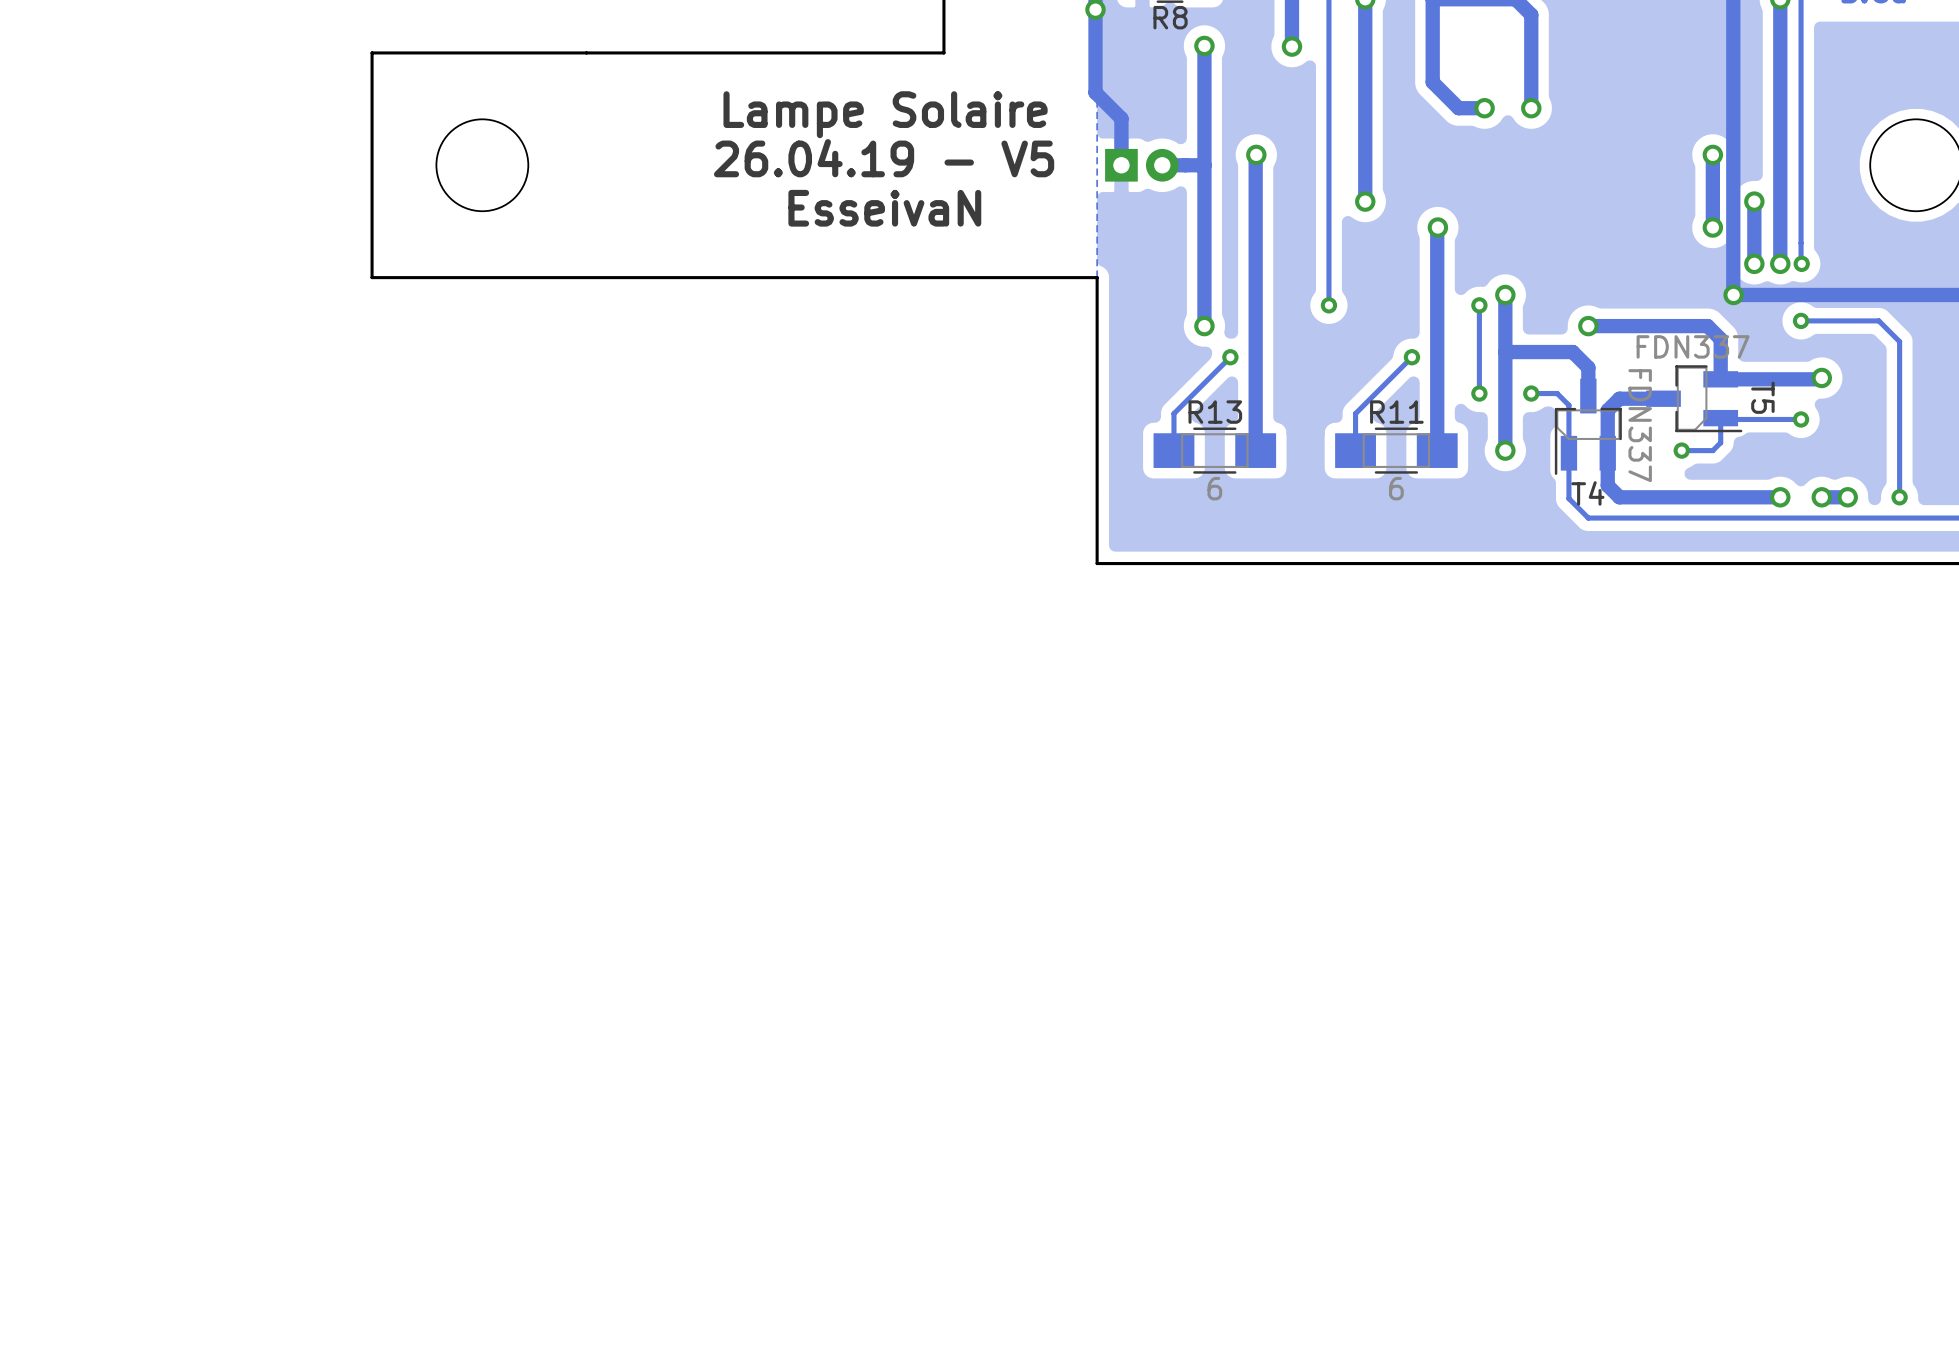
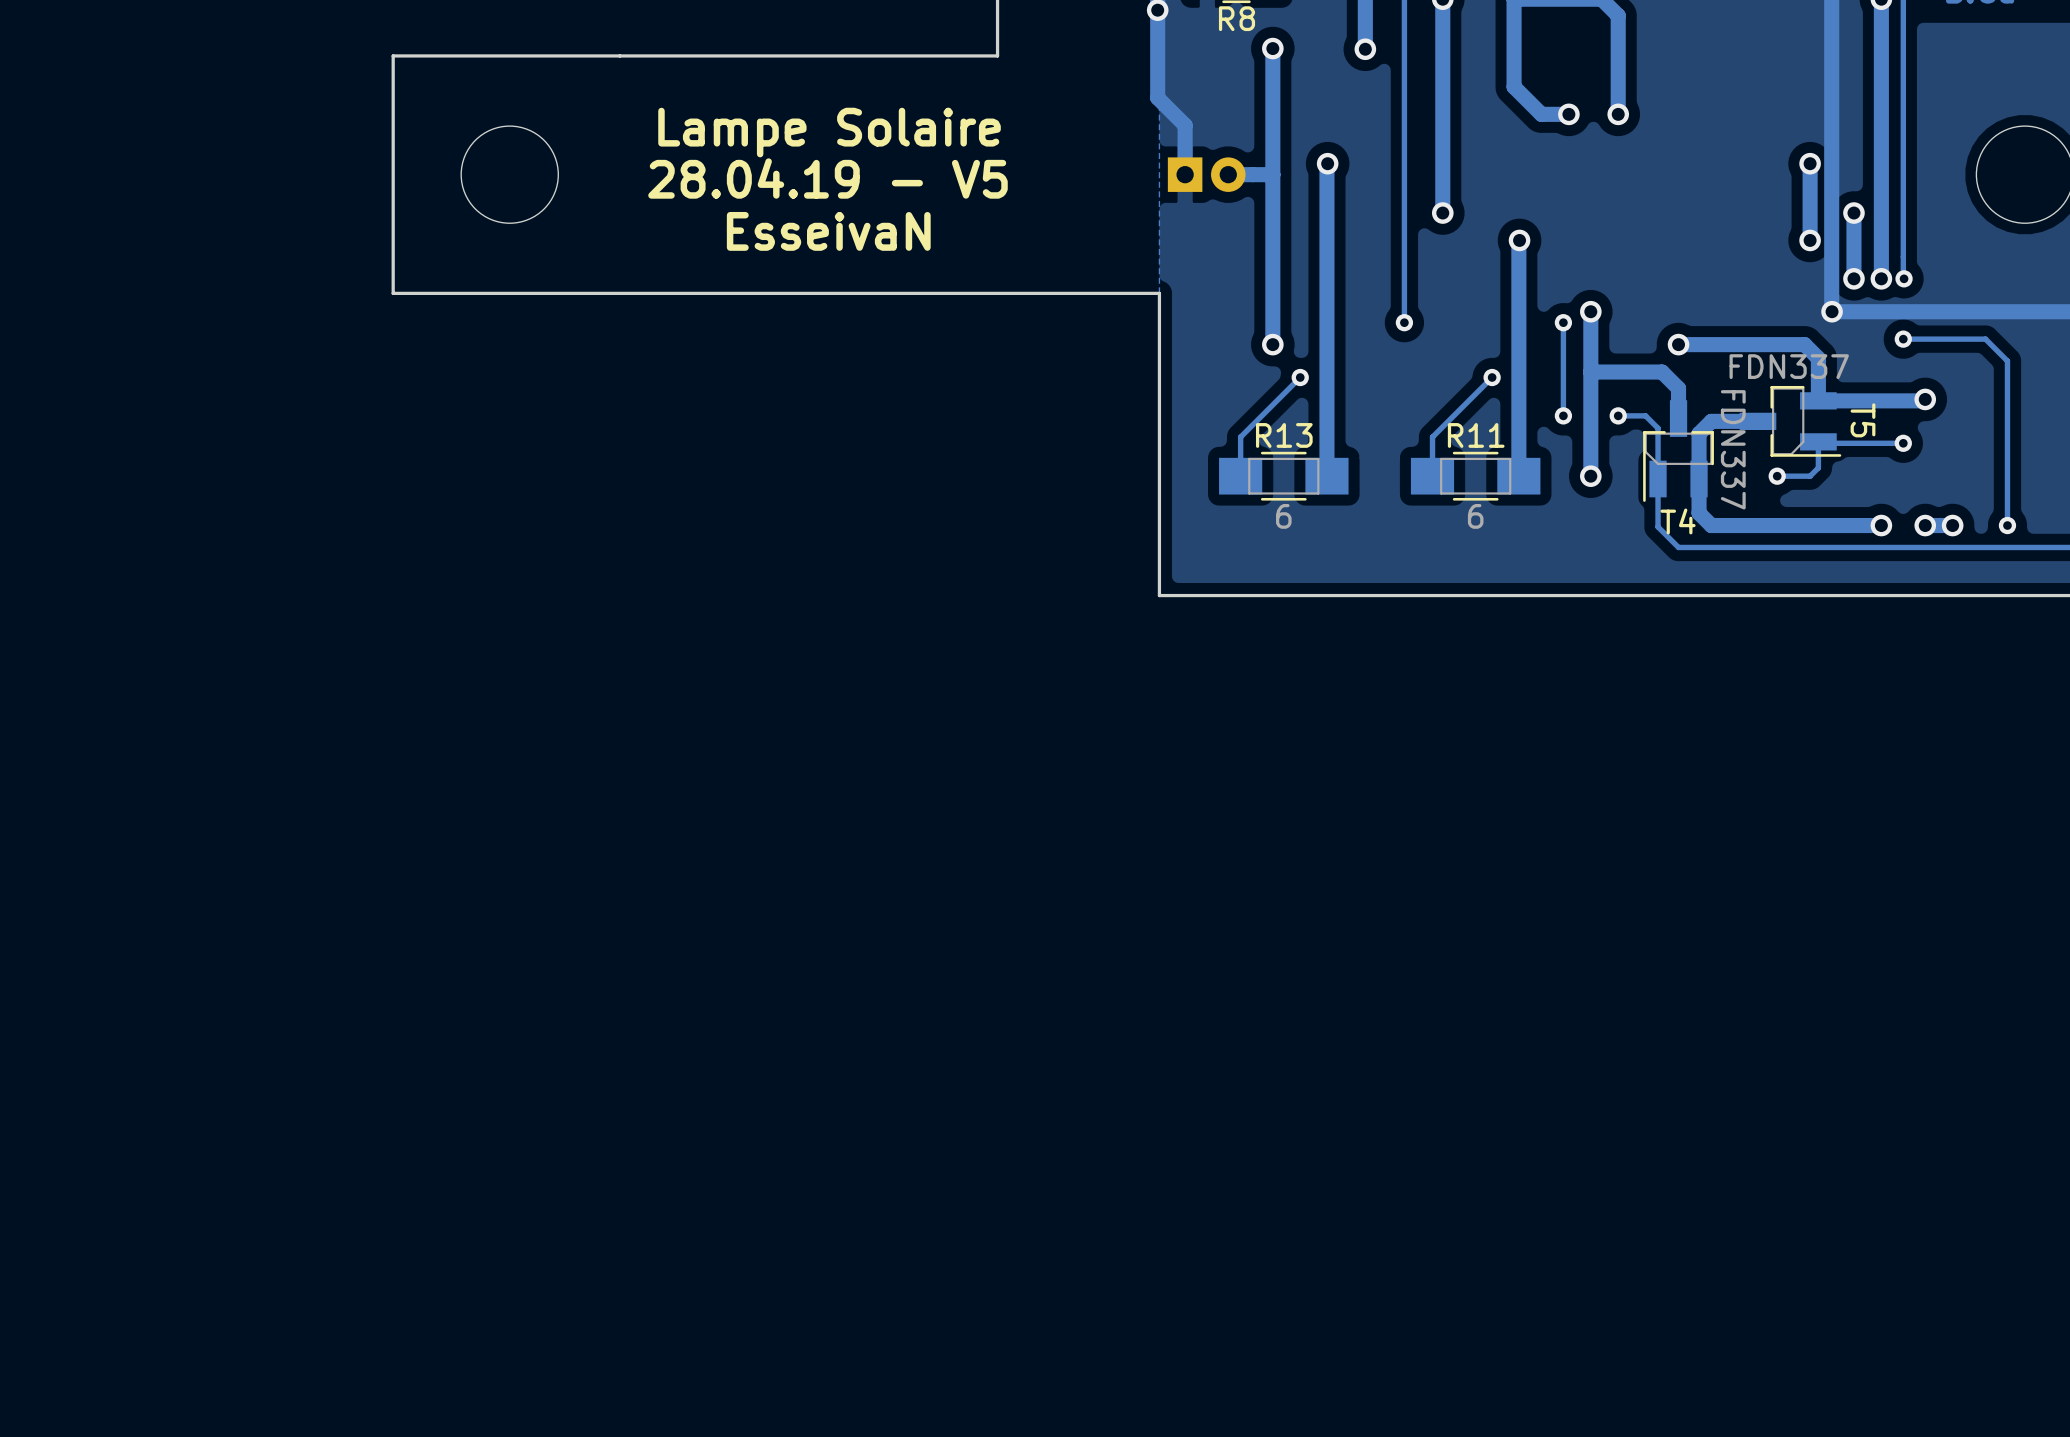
text position: Lampe Solaire (885, 114) -> Lampe Solaire (829, 132)
text: 26.04.19 - V5 (884, 158) -> 28.04.19 - V5 (827, 178)
text position: EsseivaN (884, 208) -> EsseivaN (828, 231)

